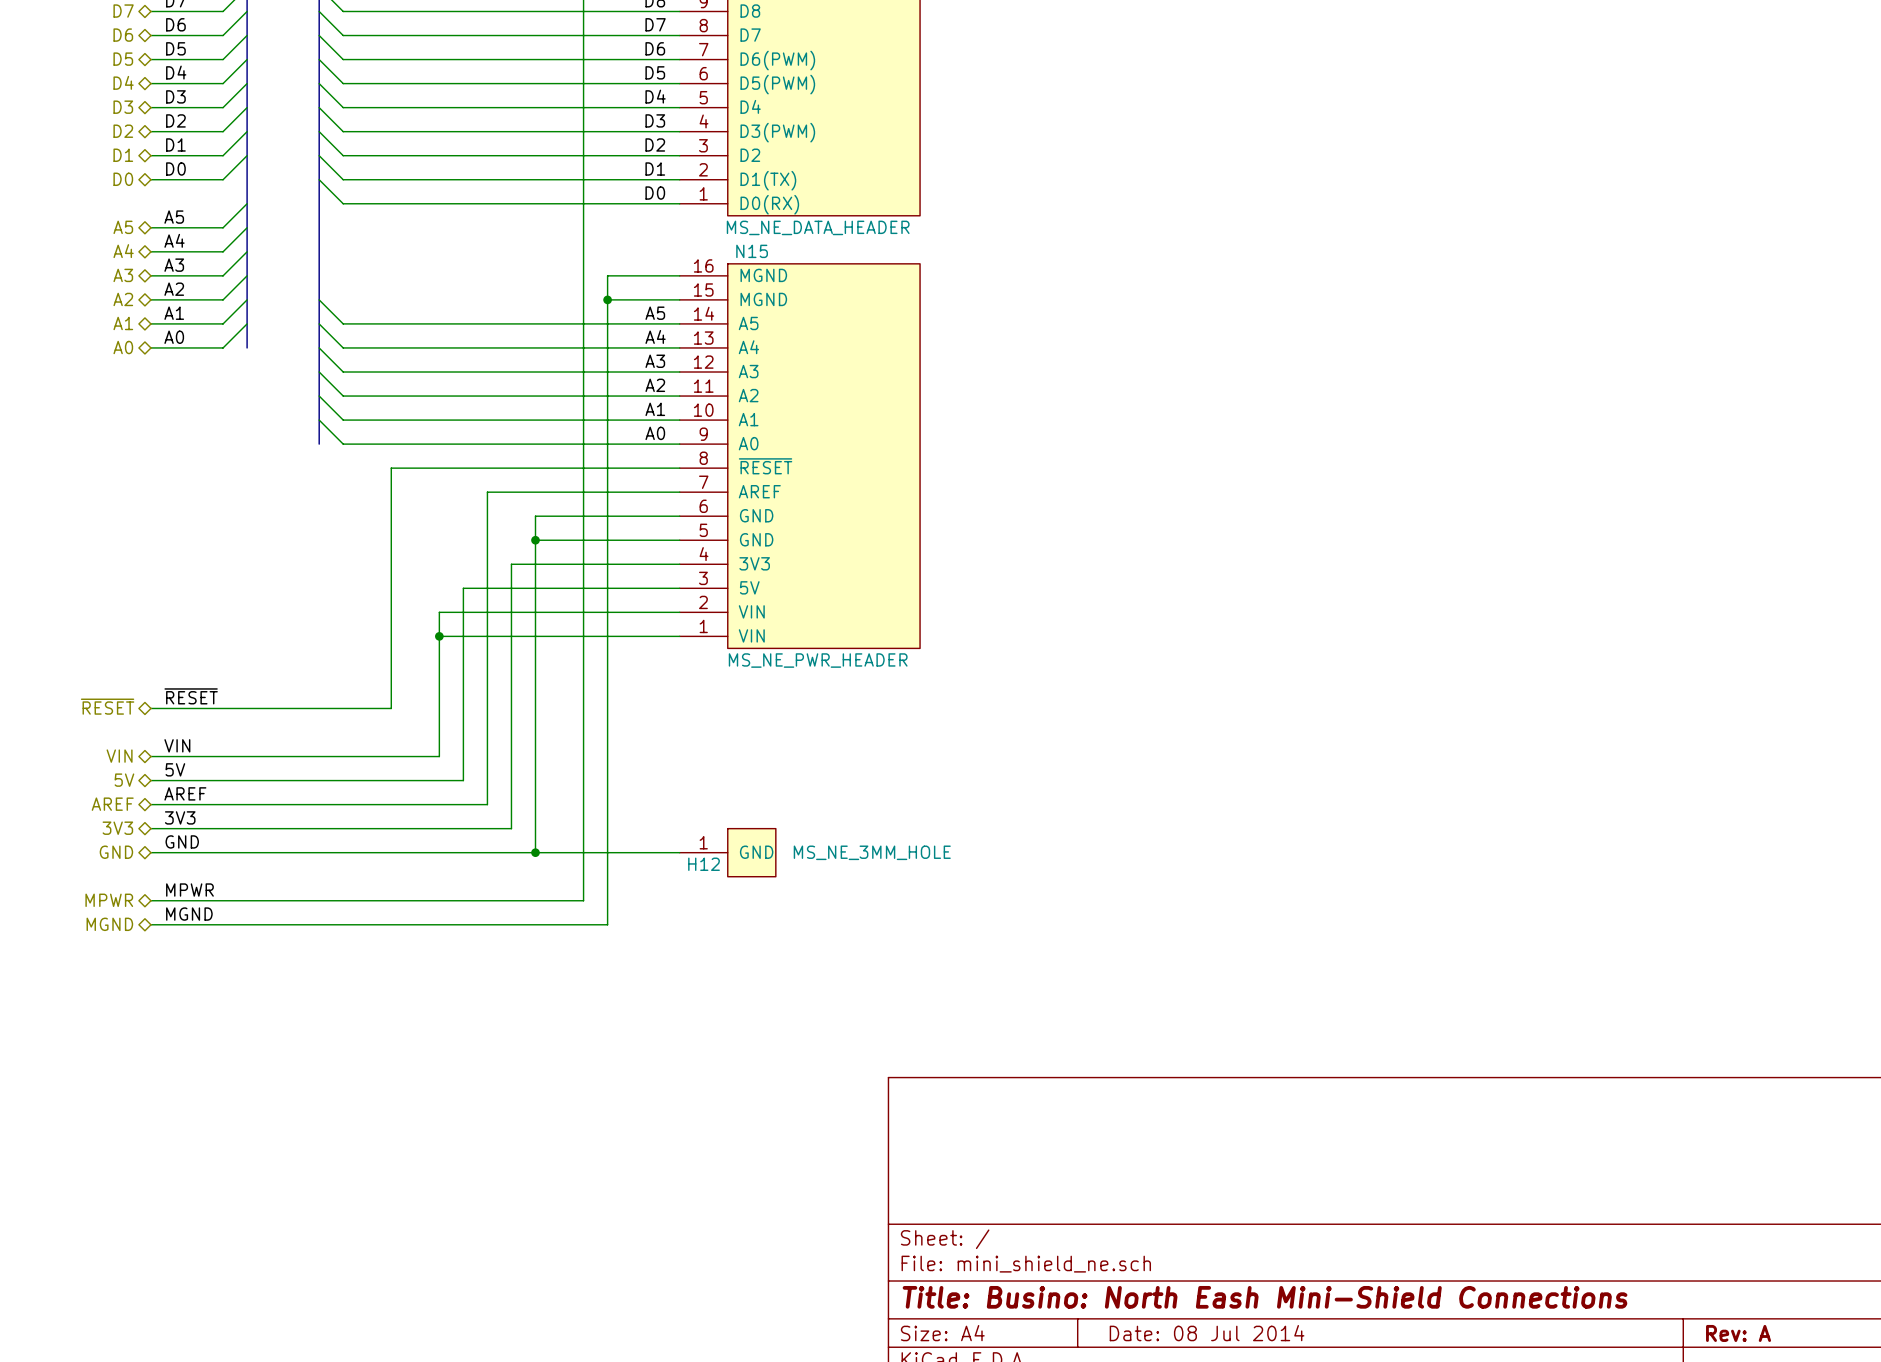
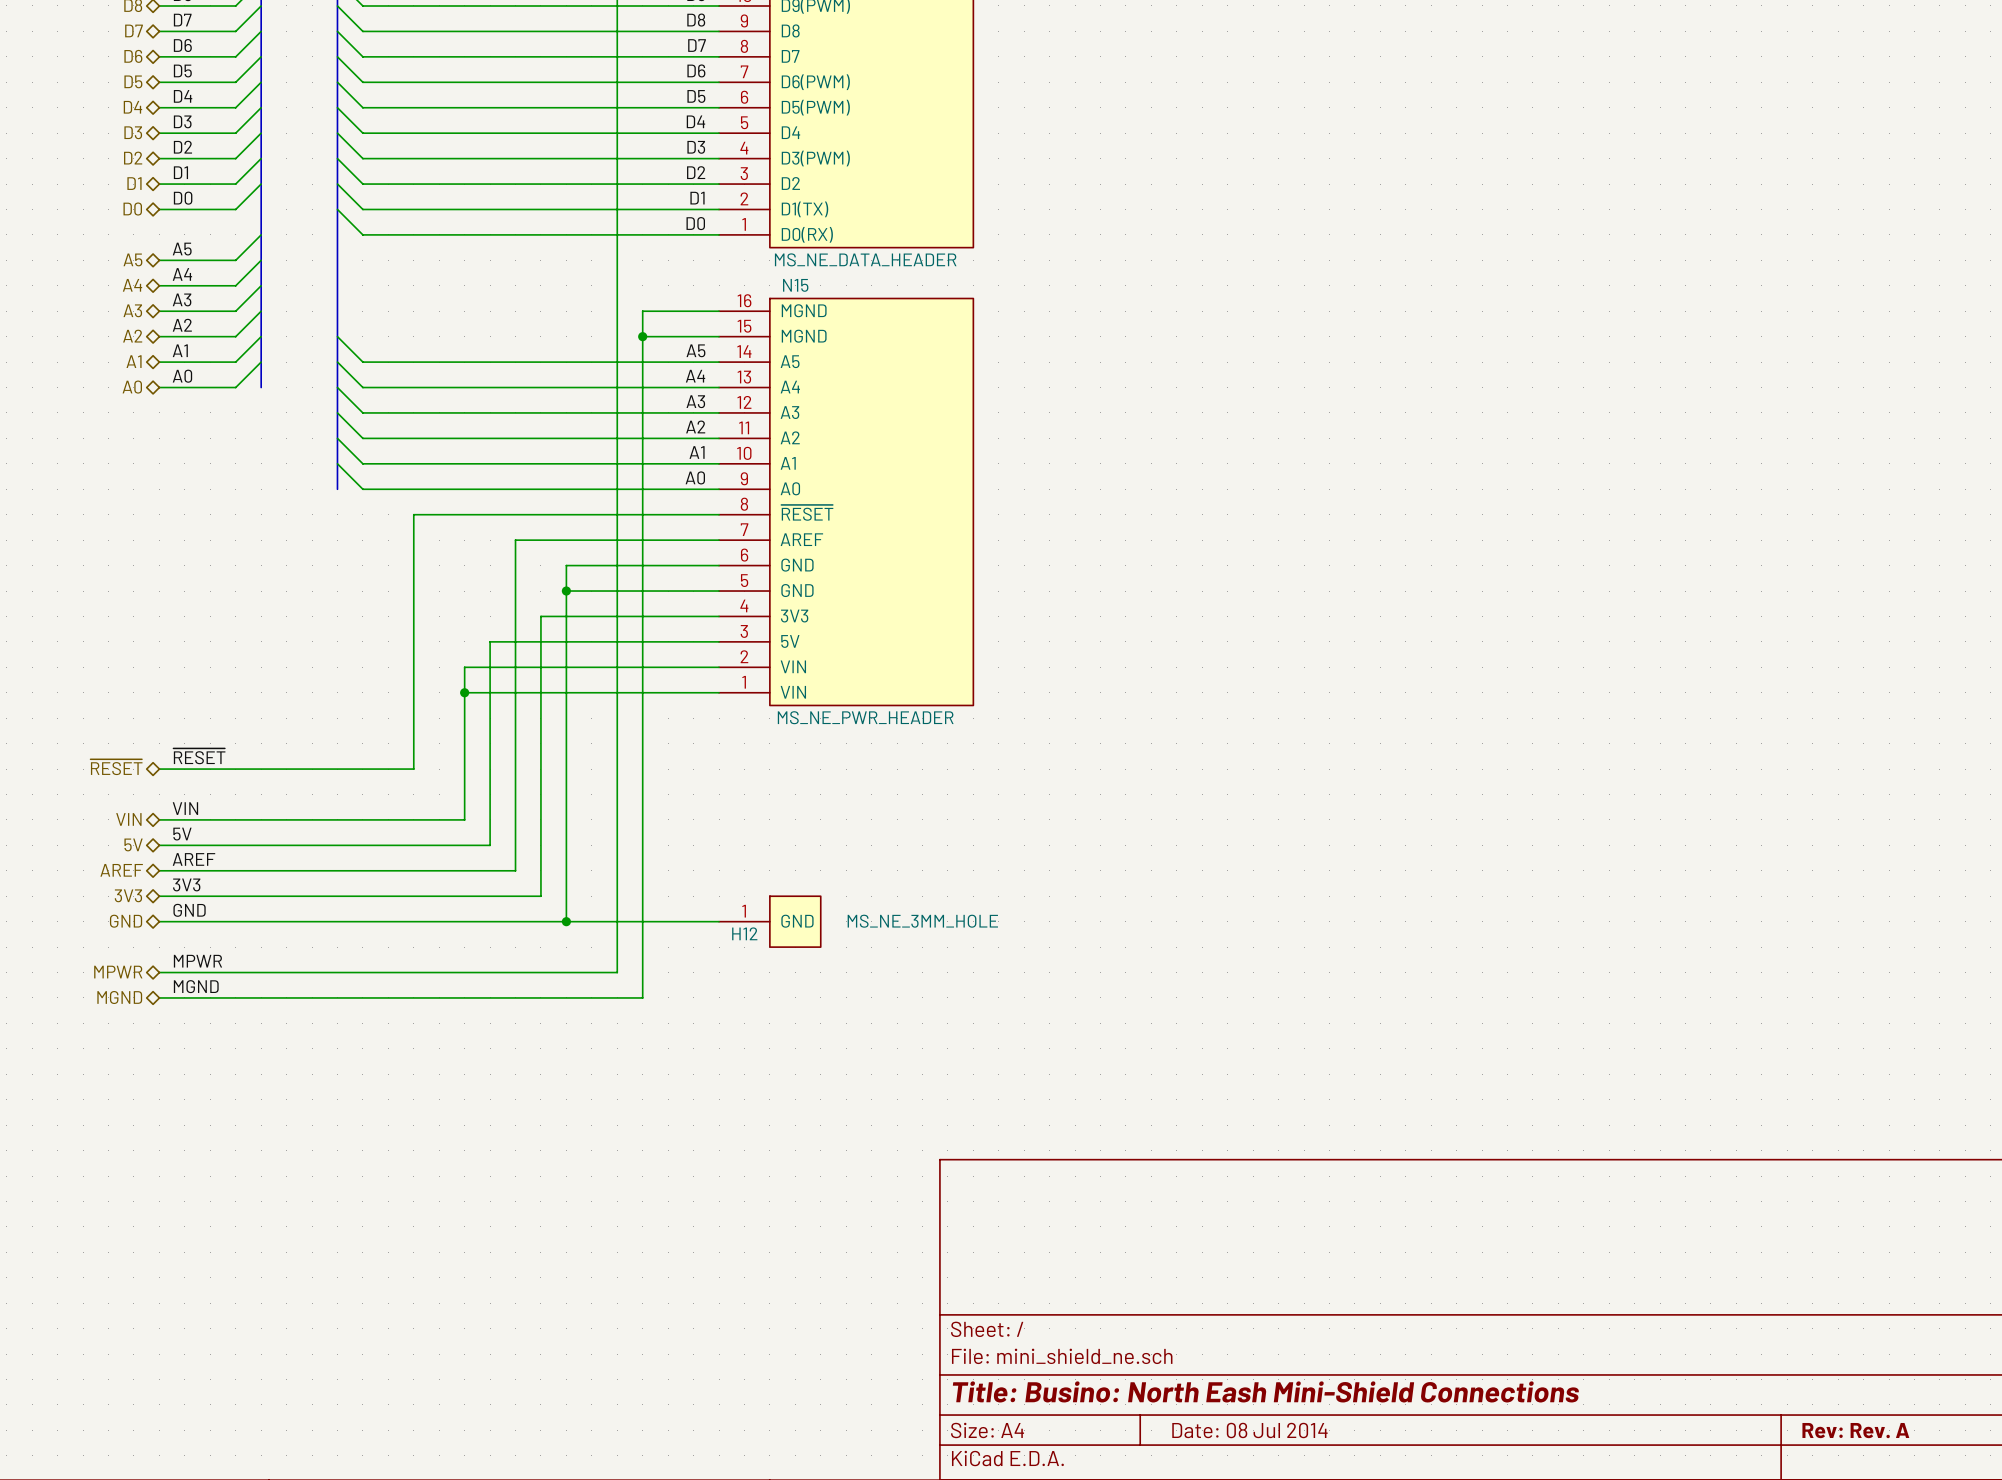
title block: Rev: A (1738, 1333) -> Rev: Rev. A (1855, 1430)

